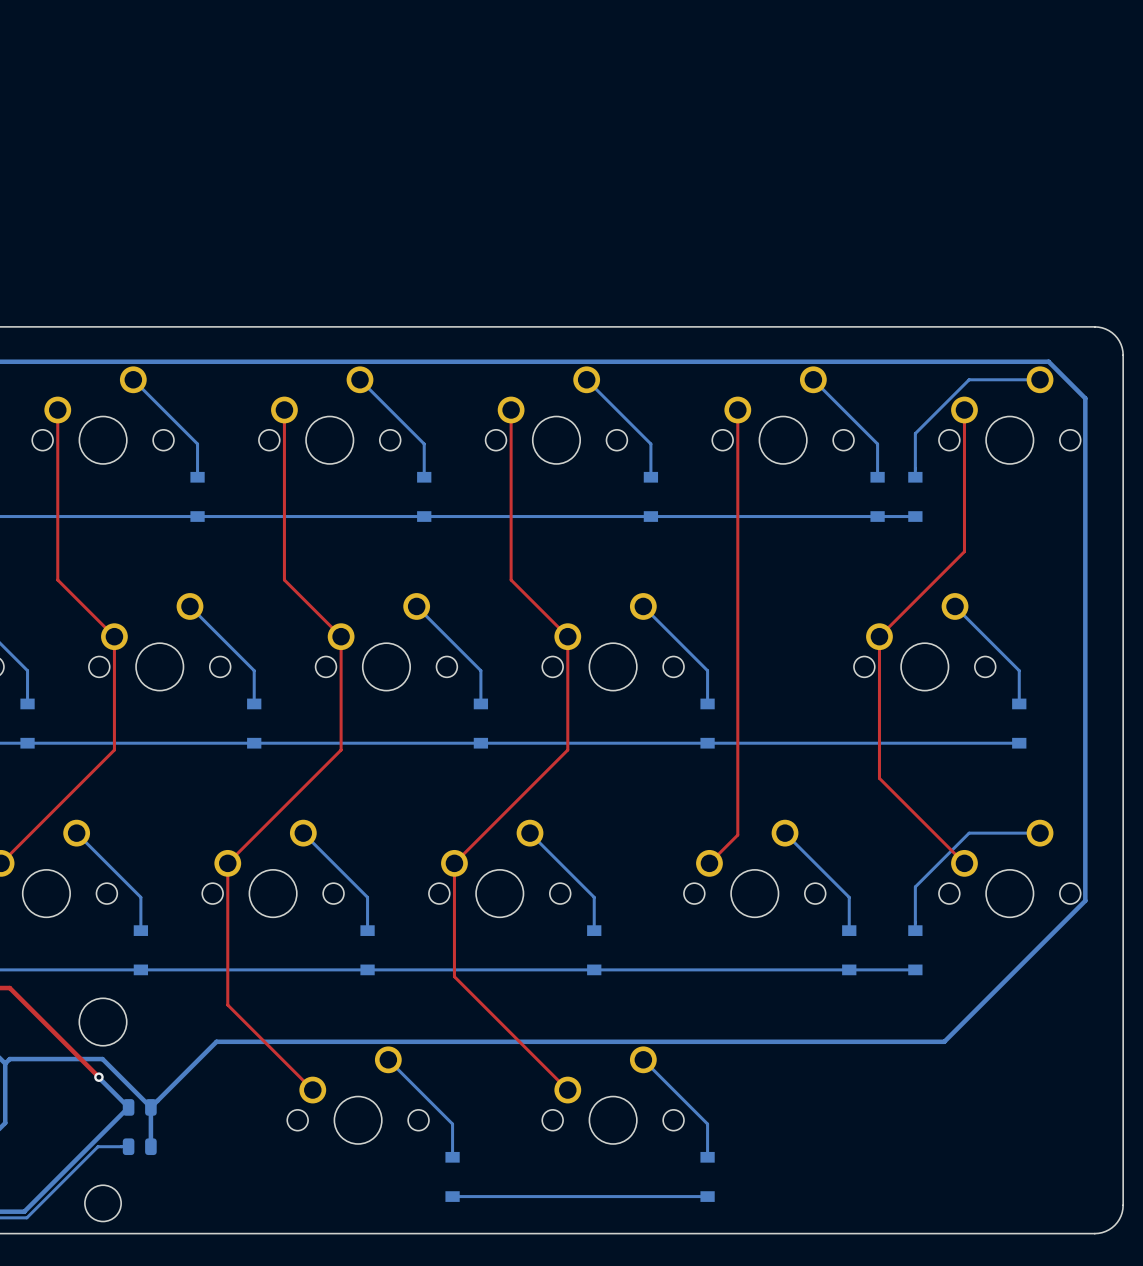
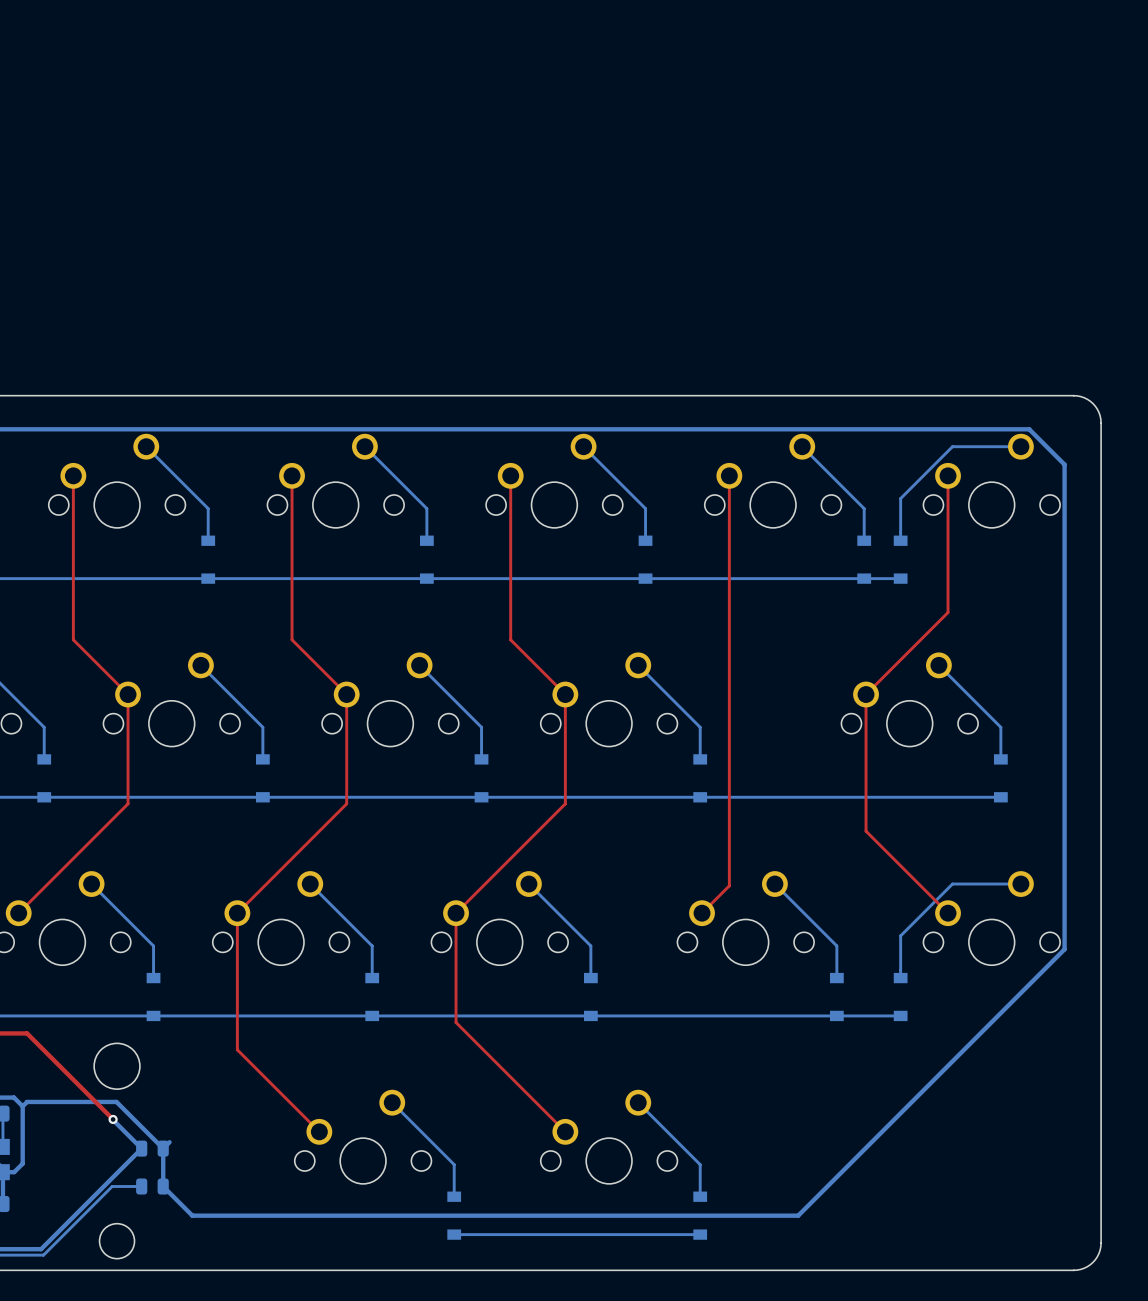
bottom track: (944, 1041) (216, 1041) (157, 1100) -> (928, 1085) (798, 1215) (192, 1215) (163, 1186)

